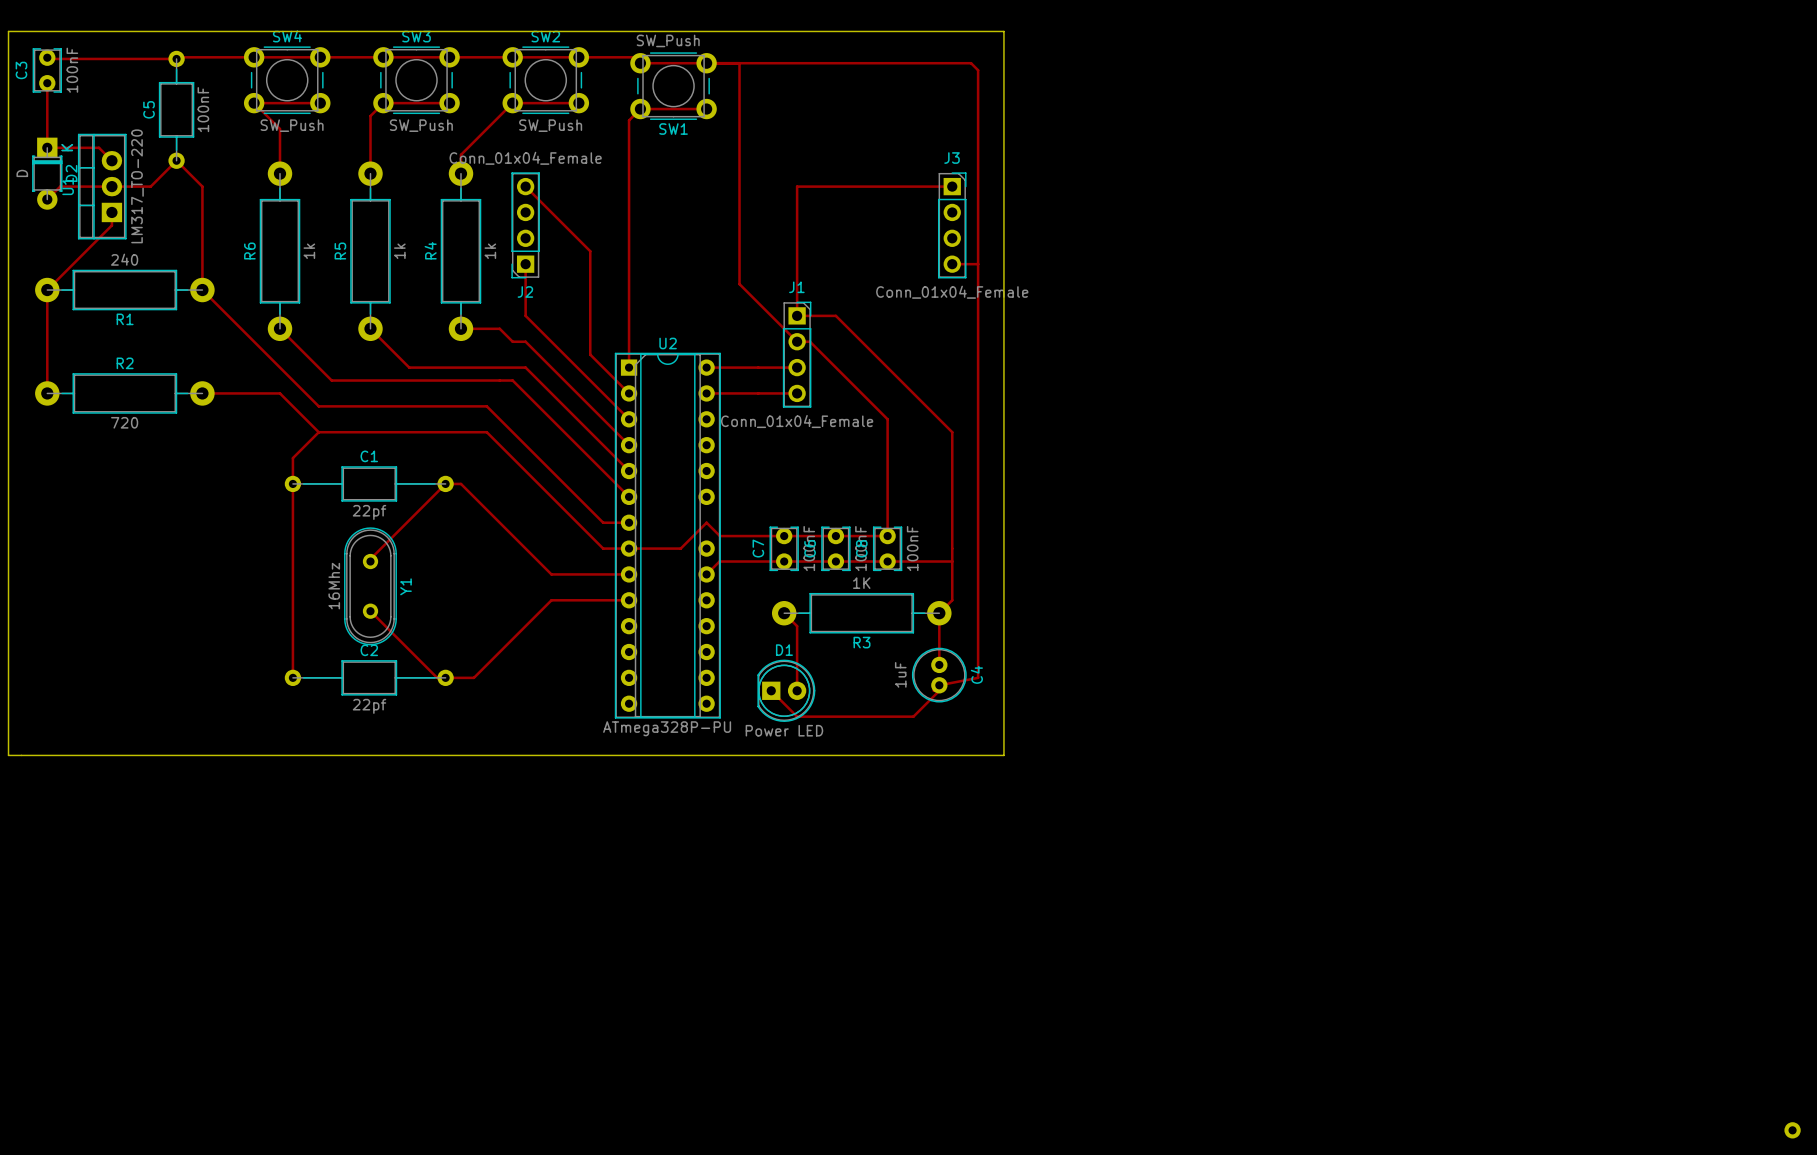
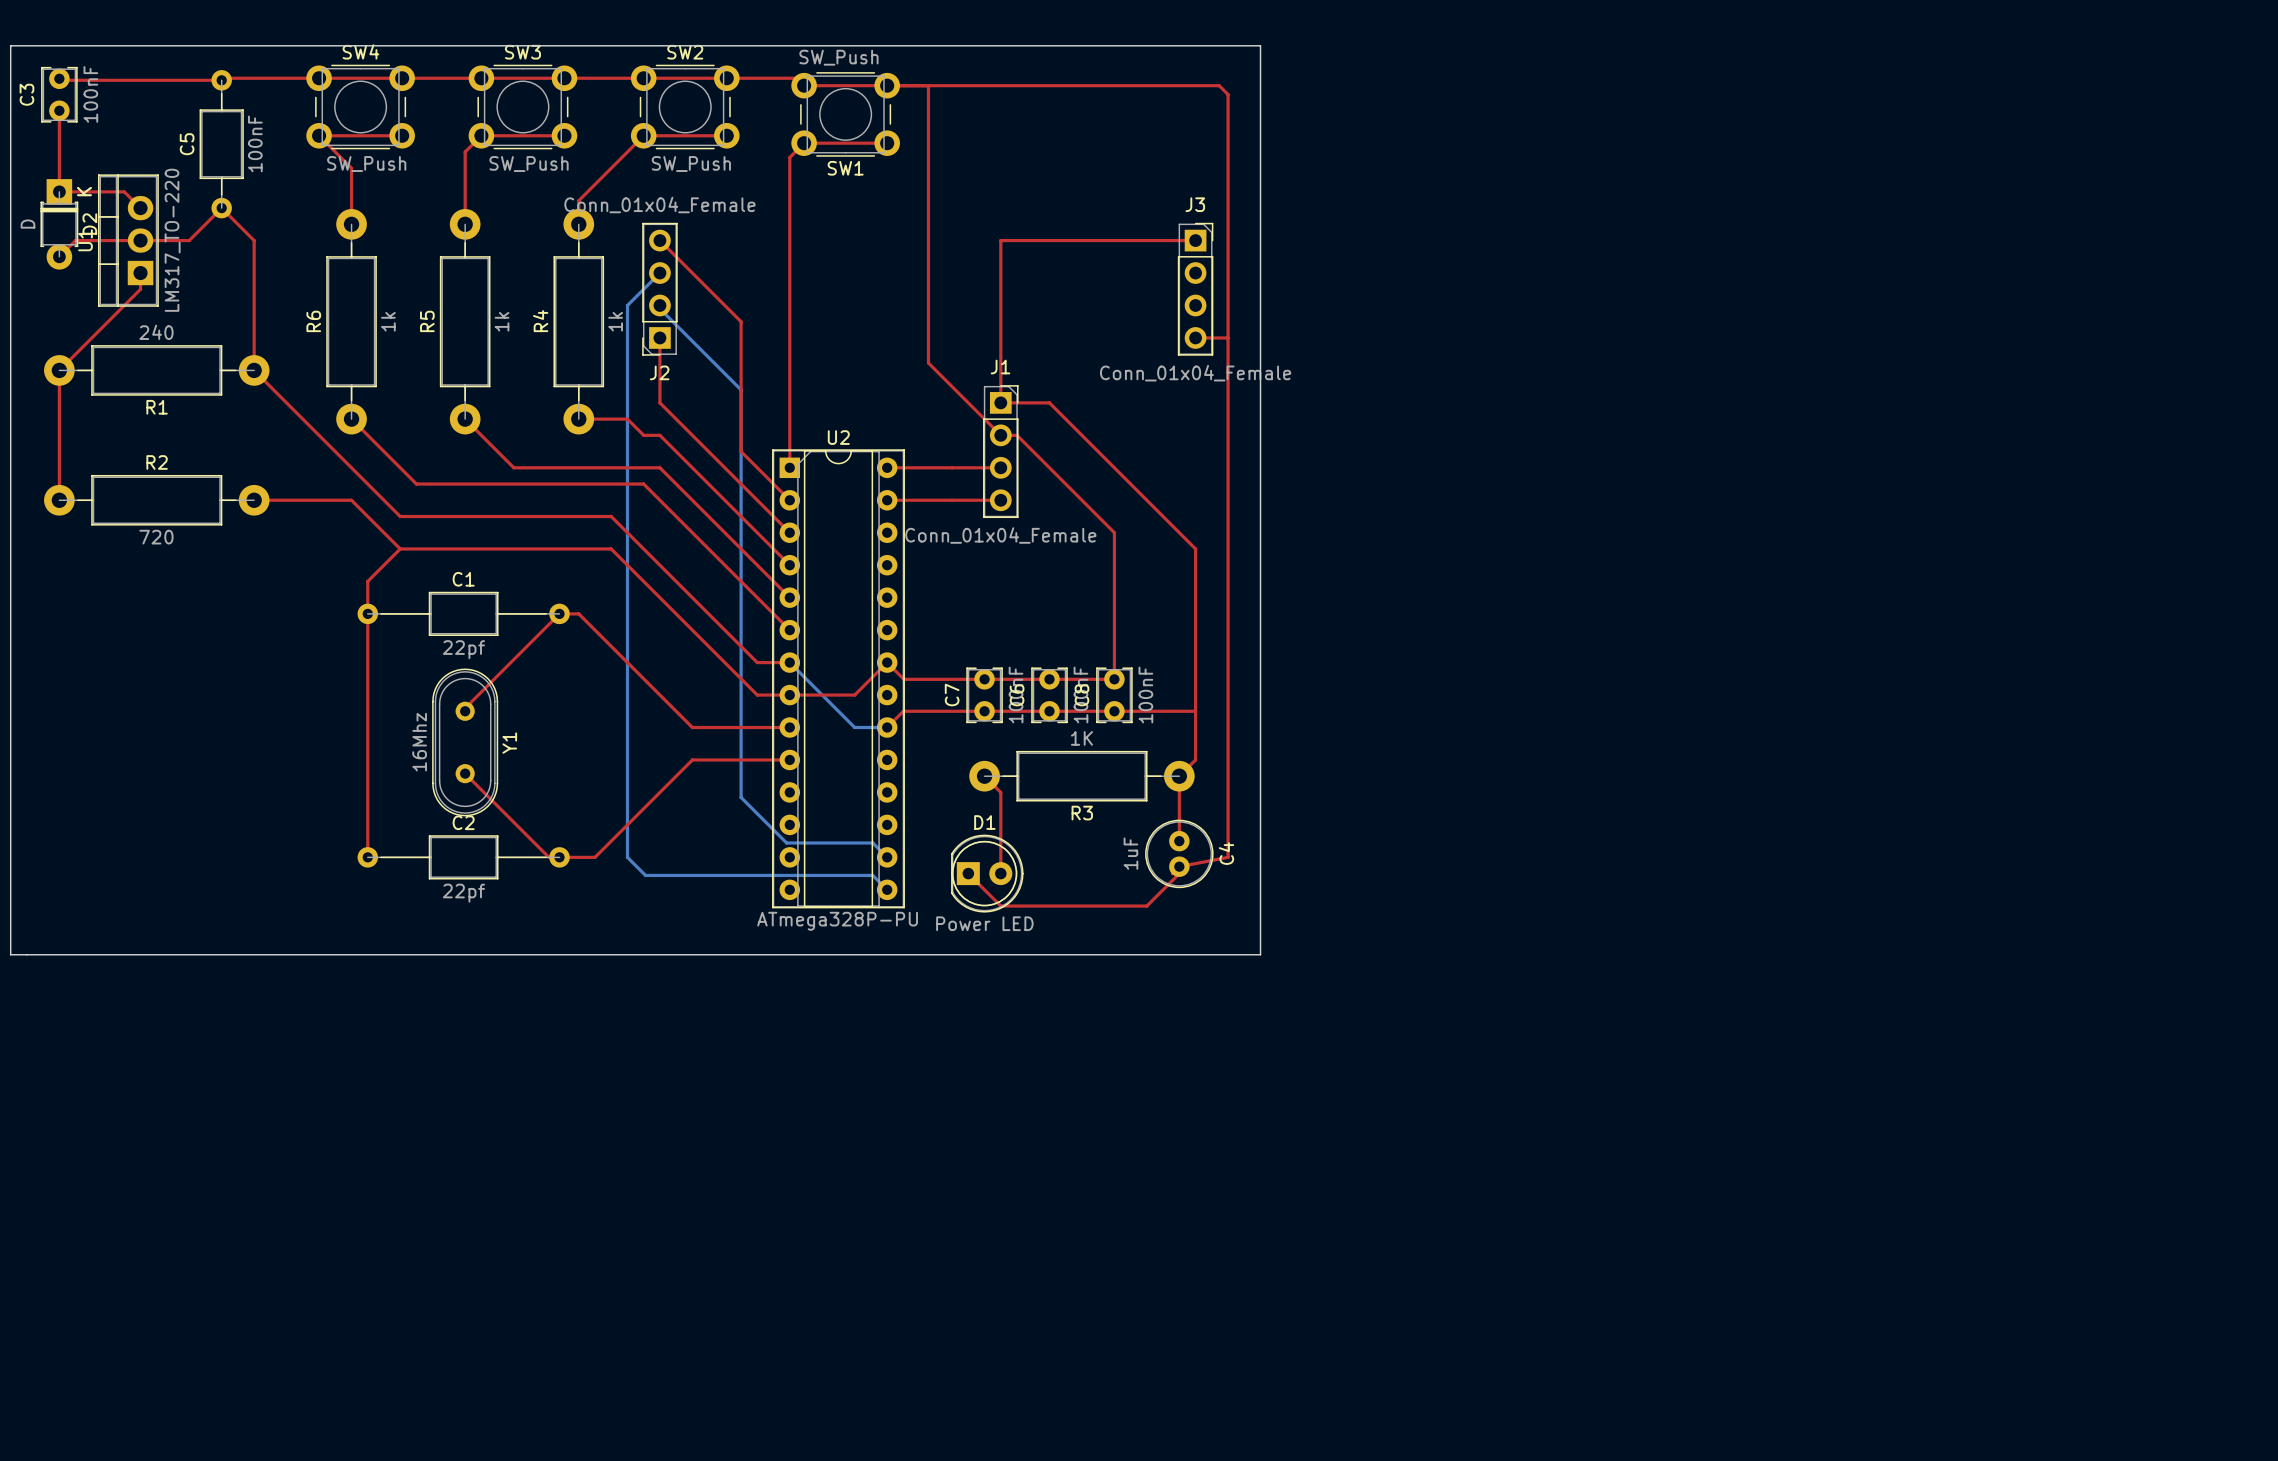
bottom track: none -> (659, 273) (627, 305) (627, 857) (645, 875) (872, 875) (887, 889)
bottom track: none -> (659, 305) (659, 308) (741, 389) (741, 797) (786, 842) (872, 842) (887, 857)
U2 footprint: [614, 352, 1801, 1139] -> [772, 449, 905, 909]
bottom track: none -> (789, 662) (854, 727) (887, 727)

